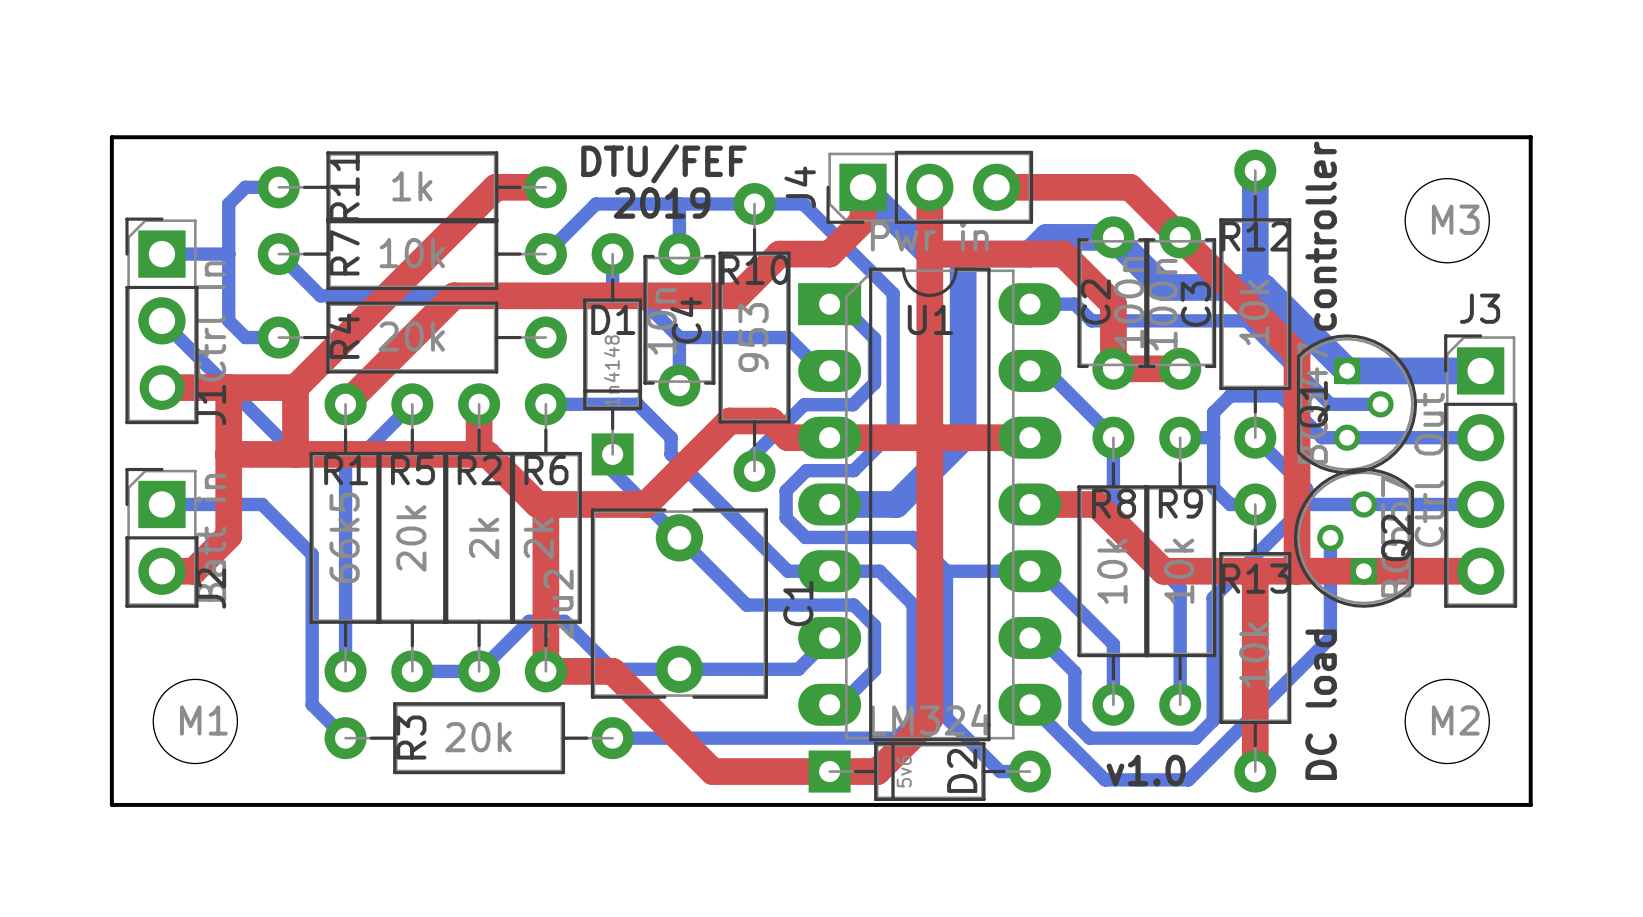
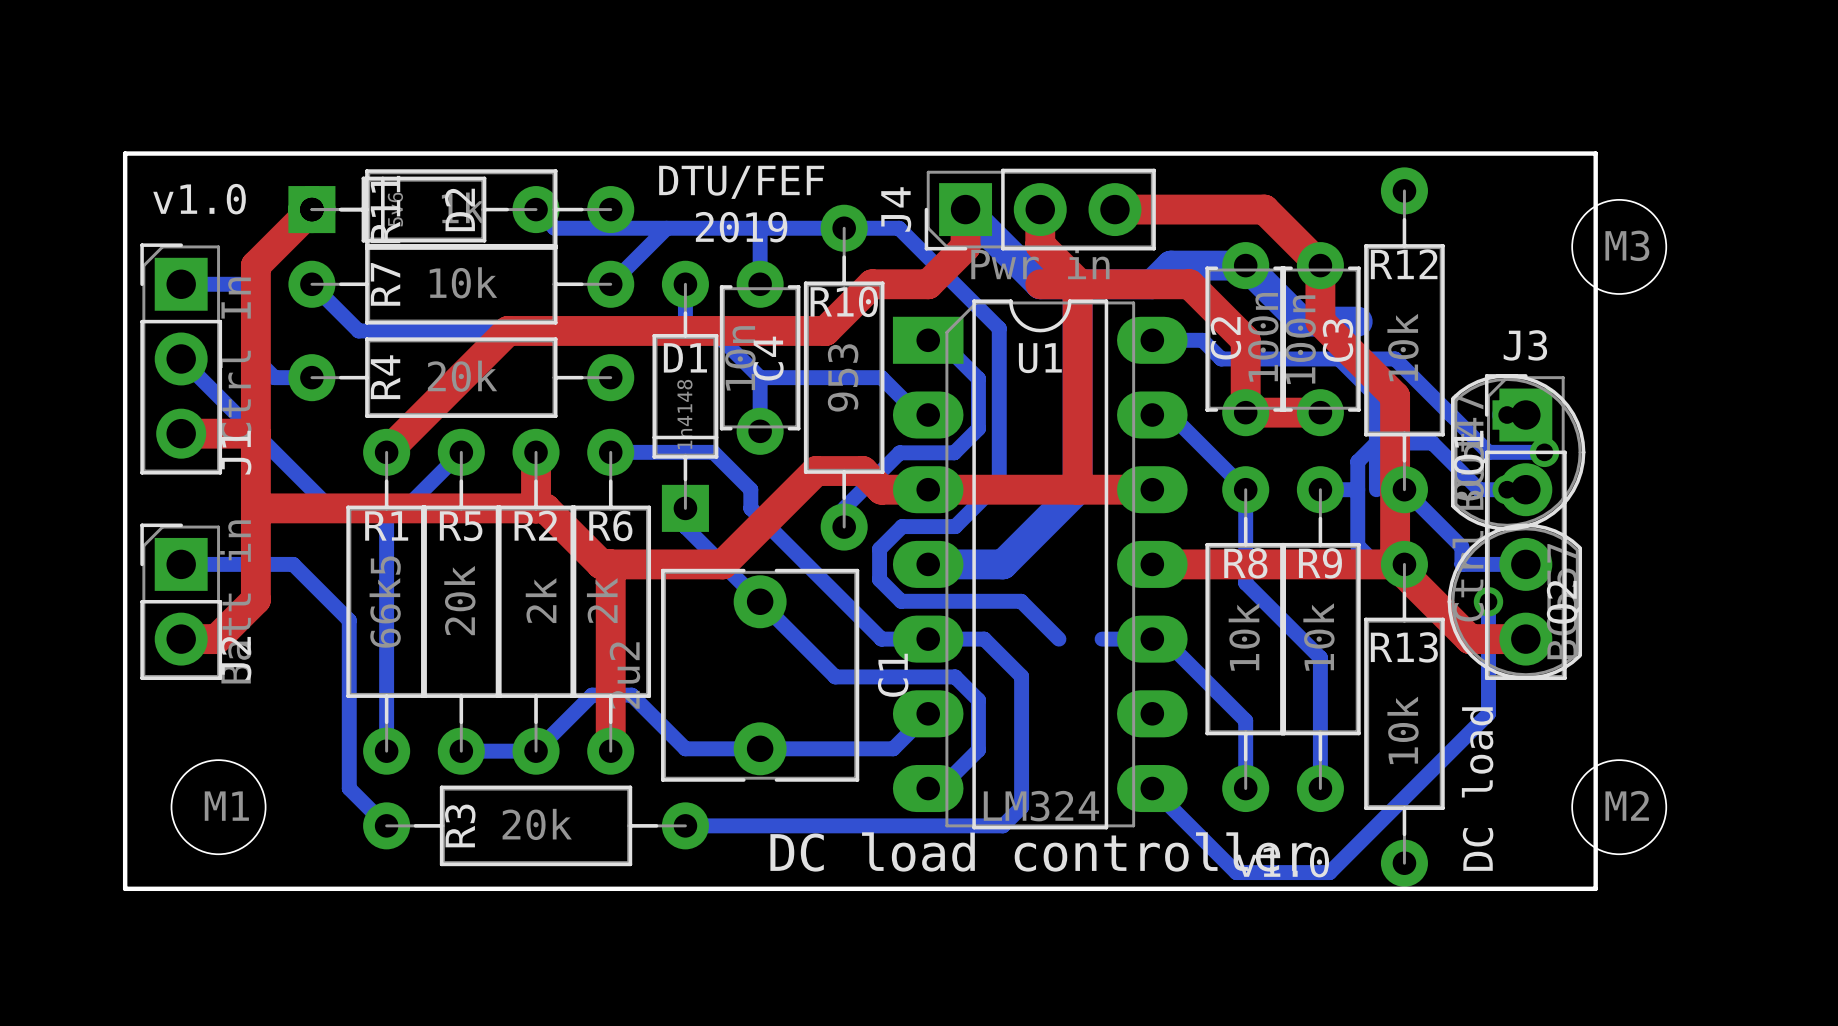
board edge: (1426, 137) (1530, 137) (1530, 804) (111, 804) (111, 794) -> (1595, 153) (1595, 888) (125, 888)
bottom track: (1255, 170) (1255, 287) -> none
text: none -> v1.0 (199, 199)
bottom track: (278, 187) (245, 187) (228, 204) (228, 320) -> none
bottom track: none -> (536, 209) (554, 228) (666, 228)
top track: (545, 187) (495, 187) (295, 387) -> none
top track: (929, 218) (929, 719) (877, 771) (712, 771) (612, 671) (545, 671) -> (1040, 244) (1077, 282) (1077, 489)
text: controller (1321, 236) -> none
top track: (1180, 237) (1297, 354) (1297, 571) -> (1320, 265) (1320, 321) (1395, 396) (1395, 564)
bottom track: (1213, 287) (1263, 287) (1347, 370) -> none
bottom track: none -> (1339, 358) (1376, 396) (1376, 489)
bottom track: (1363, 370) (1480, 370) -> none
top track: (228, 387) (295, 387) -> (255, 433) (255, 265) (311, 209)
top track: (295, 387) (295, 454) -> none
bottom track: (1363, 437) (1480, 437) -> none
J3 position: (1480, 471) -> (1525, 527)
top track: (1096, 504) (1163, 571) (1313, 571) -> (1227, 564) (1395, 564)
top track: none -> (1395, 564) (1469, 639)
bottom track: (1306, 504) (1213, 597) (1213, 720) (1195, 738) (1089, 738) (1074, 723) (1074, 672) (1040, 638) (1029, 638) -> none
bottom track: (1363, 504) (1480, 504) -> none
bottom track: (985, 571) (946, 571) (946, 717) (1000, 771) (1029, 771) -> none
top track: (1246, 571) (1255, 579) (1255, 771) -> none
top track: (1363, 571) (1480, 571) -> none
text: none -> DC load controller (1040, 851)
D2 position: (929, 771) -> (423, 209)

